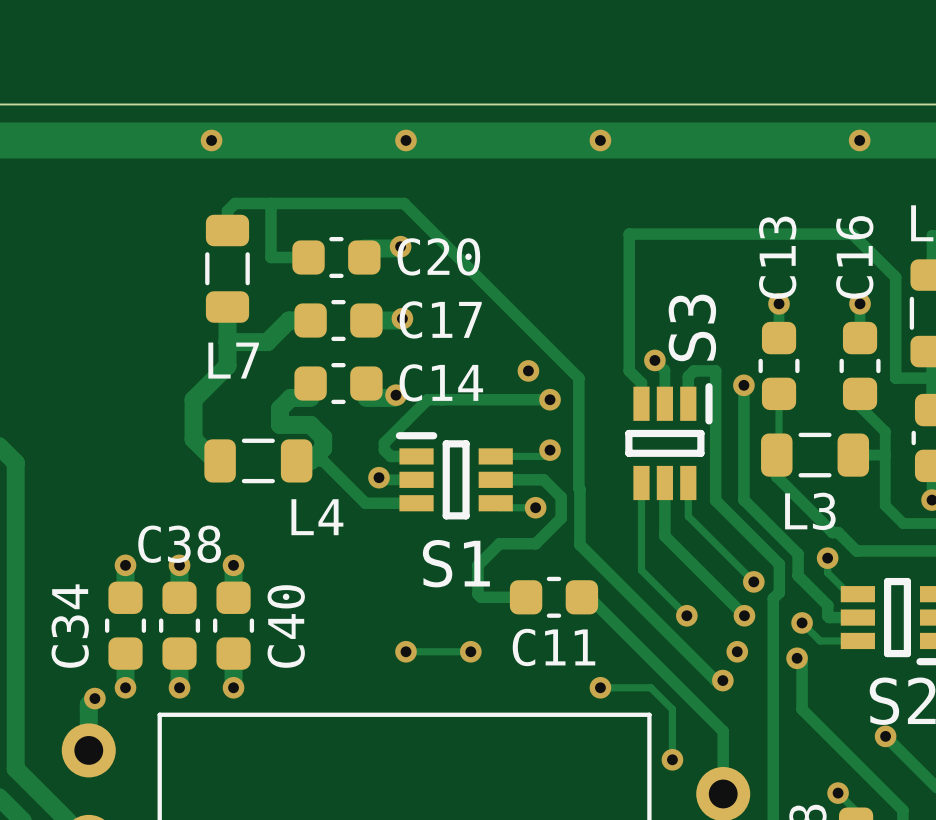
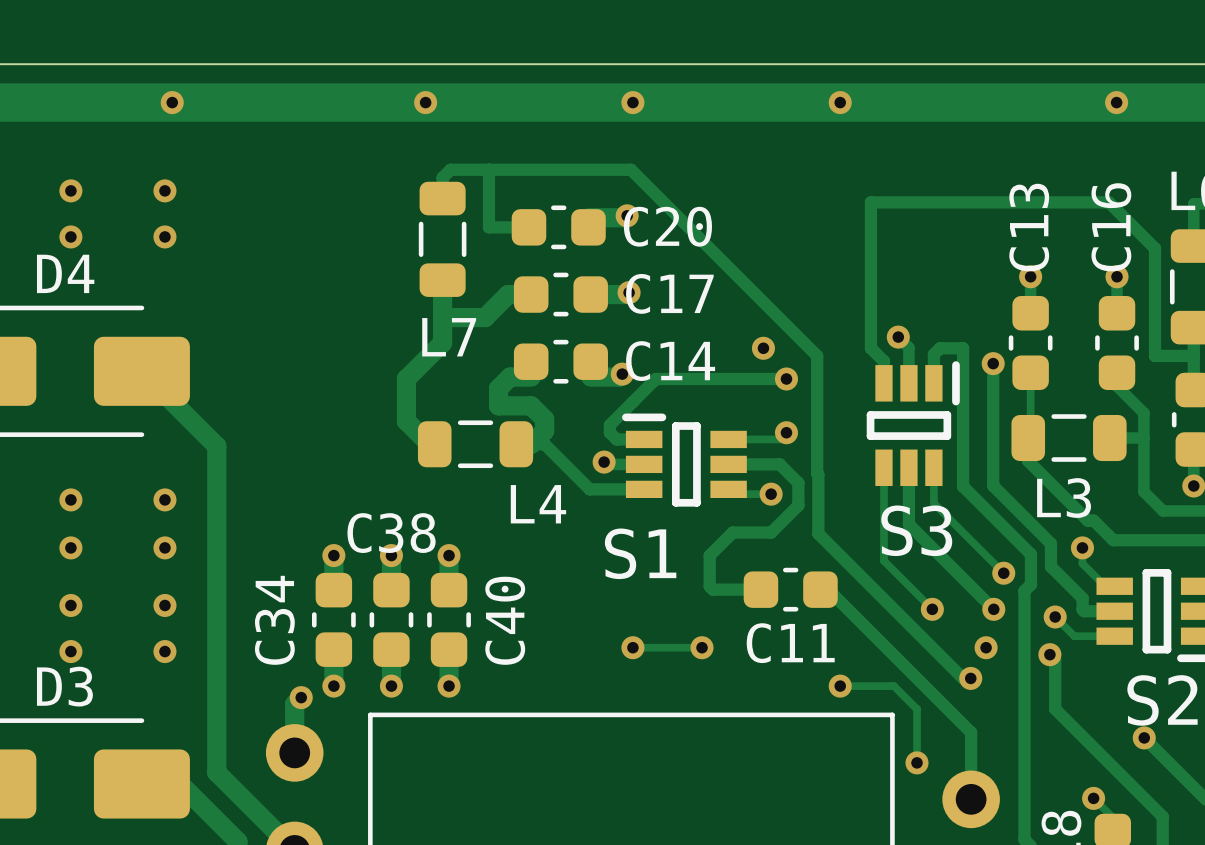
S3 name rotation: 0° (692, 327) -> 90° clockwise (916, 530)
S3 name position: S3 (692, 327) -> S3 (916, 530)
S1 name position: S1 (456, 563) -> S1 (640, 553)

